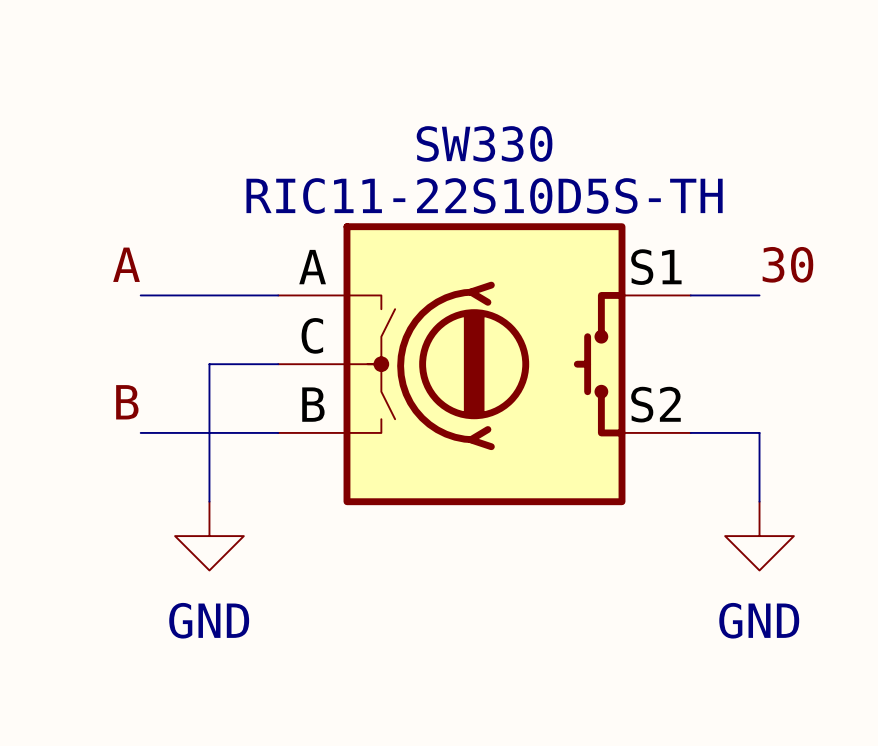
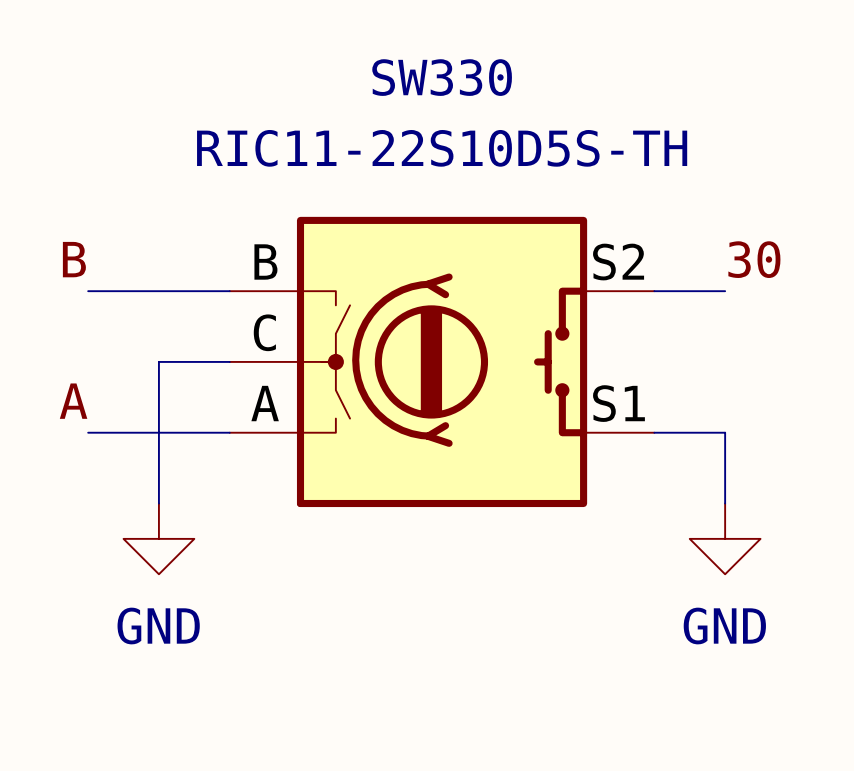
SW330 name position: SW330 (484, 143) -> SW330 (442, 77)
label: A (126, 264) -> B (74, 259)
SW330 flip: as is (484, 364) -> up-down (442, 361)
label: B (127, 402) -> A (73, 401)

